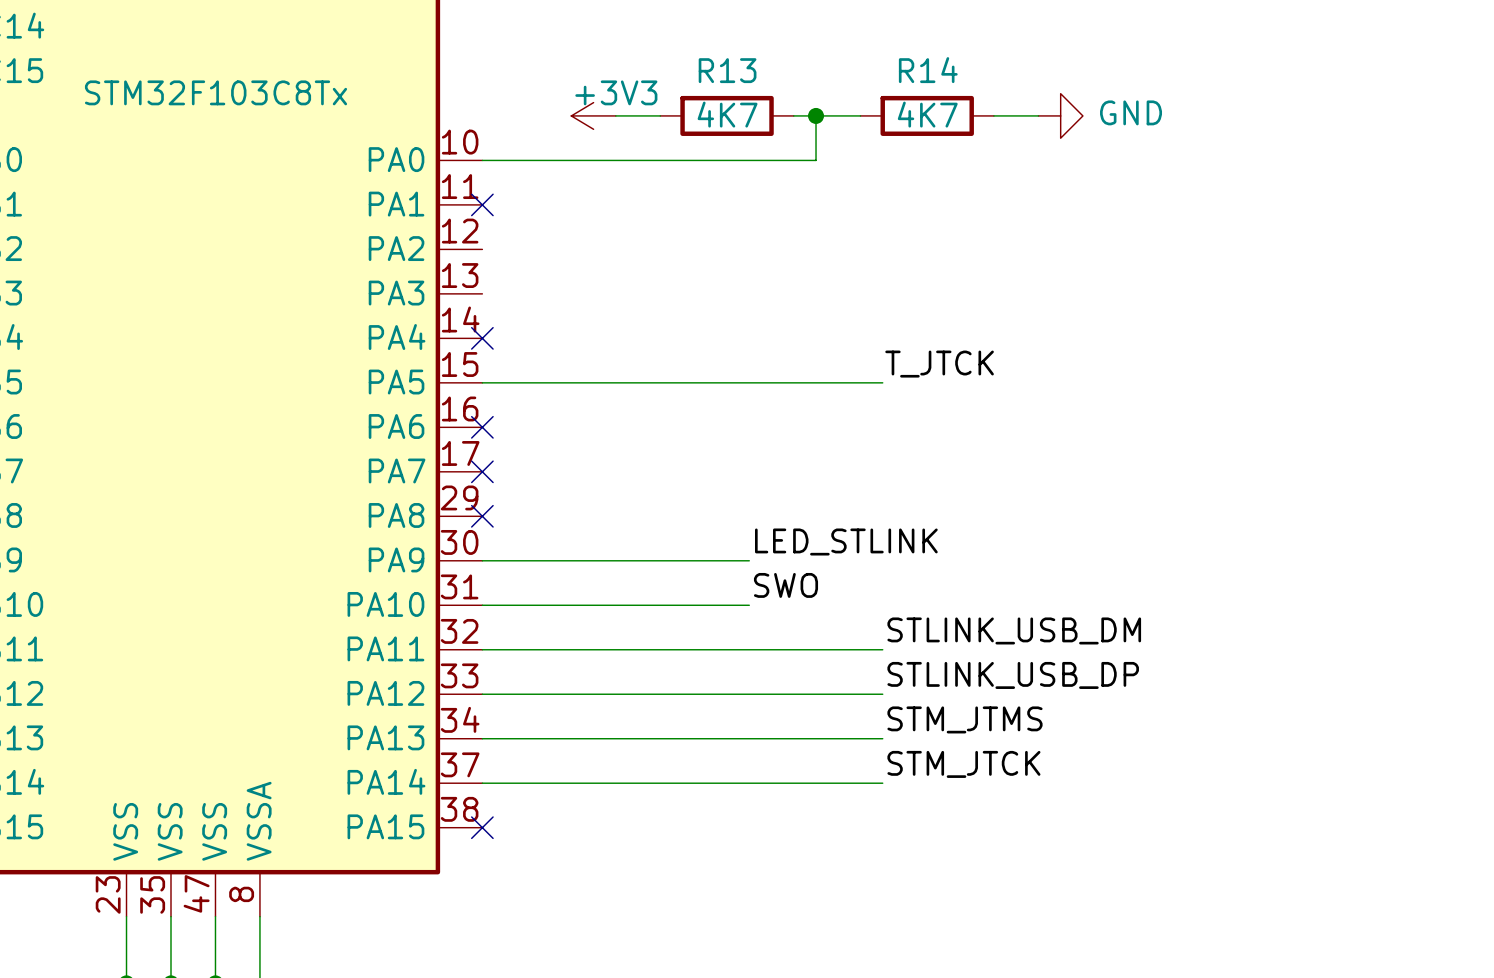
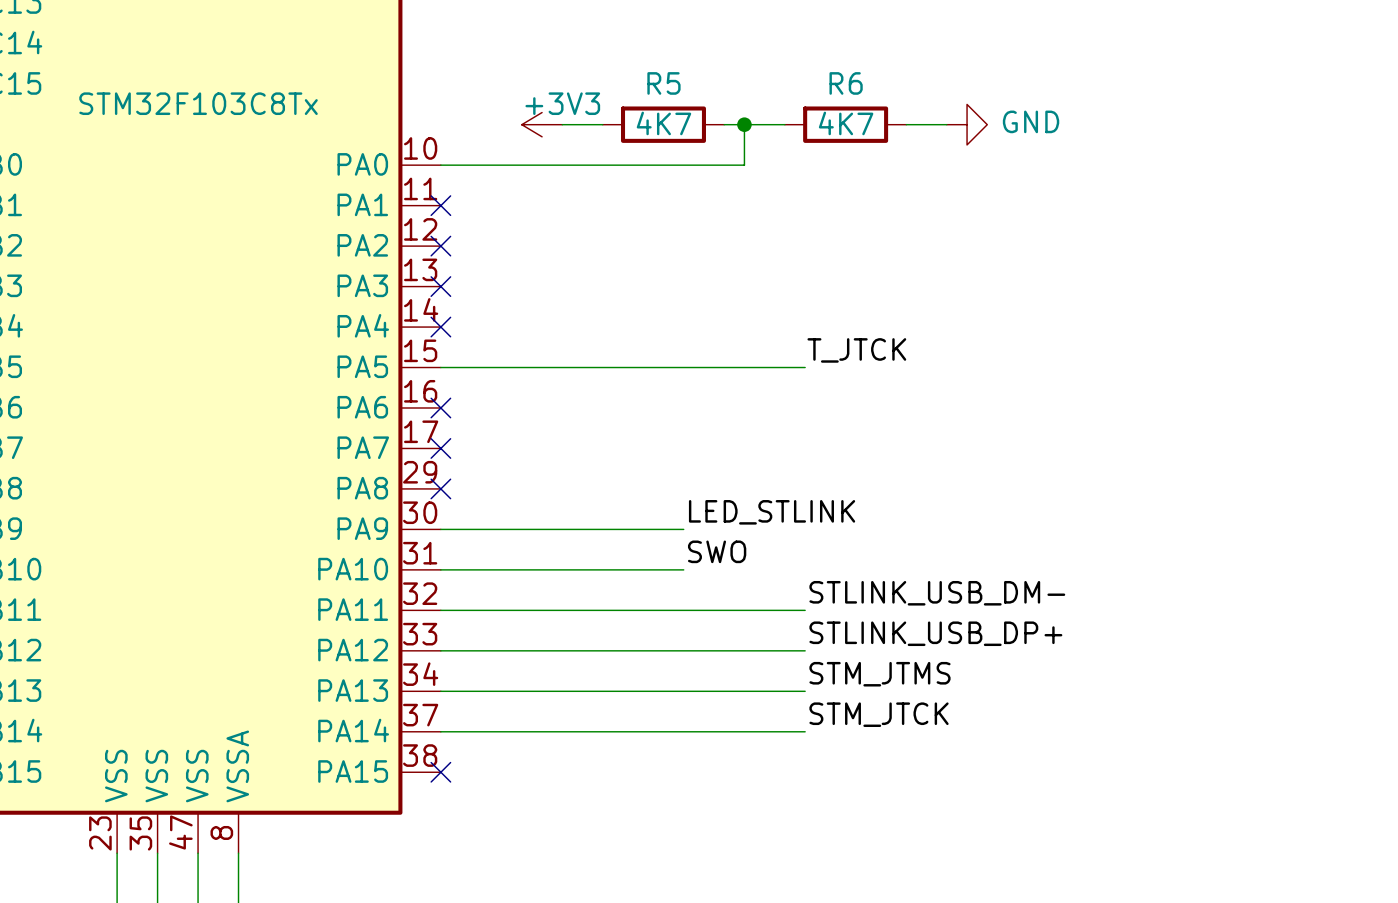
R13 name: R13 (727, 70) -> R5 (663, 83)
R14 name: R14 (928, 70) -> R6 (846, 83)
no-connect mark: none -> (440, 246)
no-connect mark: none -> (440, 286)
label: STLINK_USB_DM (1014, 630) -> STLINK_USB_DM- (937, 593)
label: STLINK_USB_DP (1013, 675) -> STLINK_USB_DP+ (935, 633)

